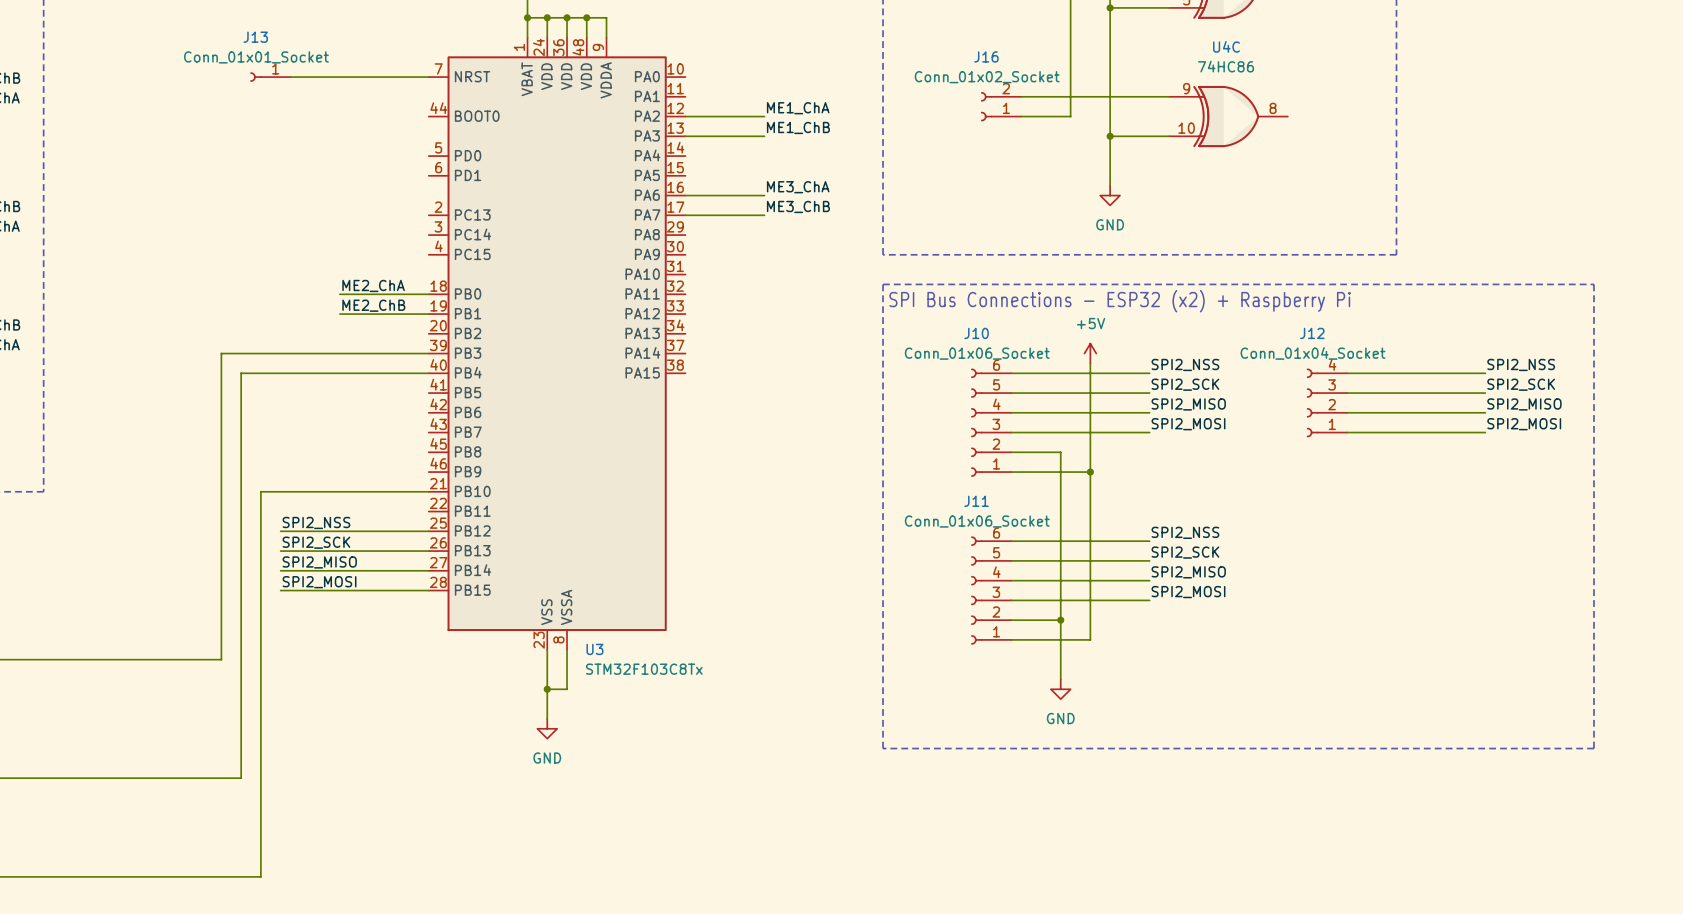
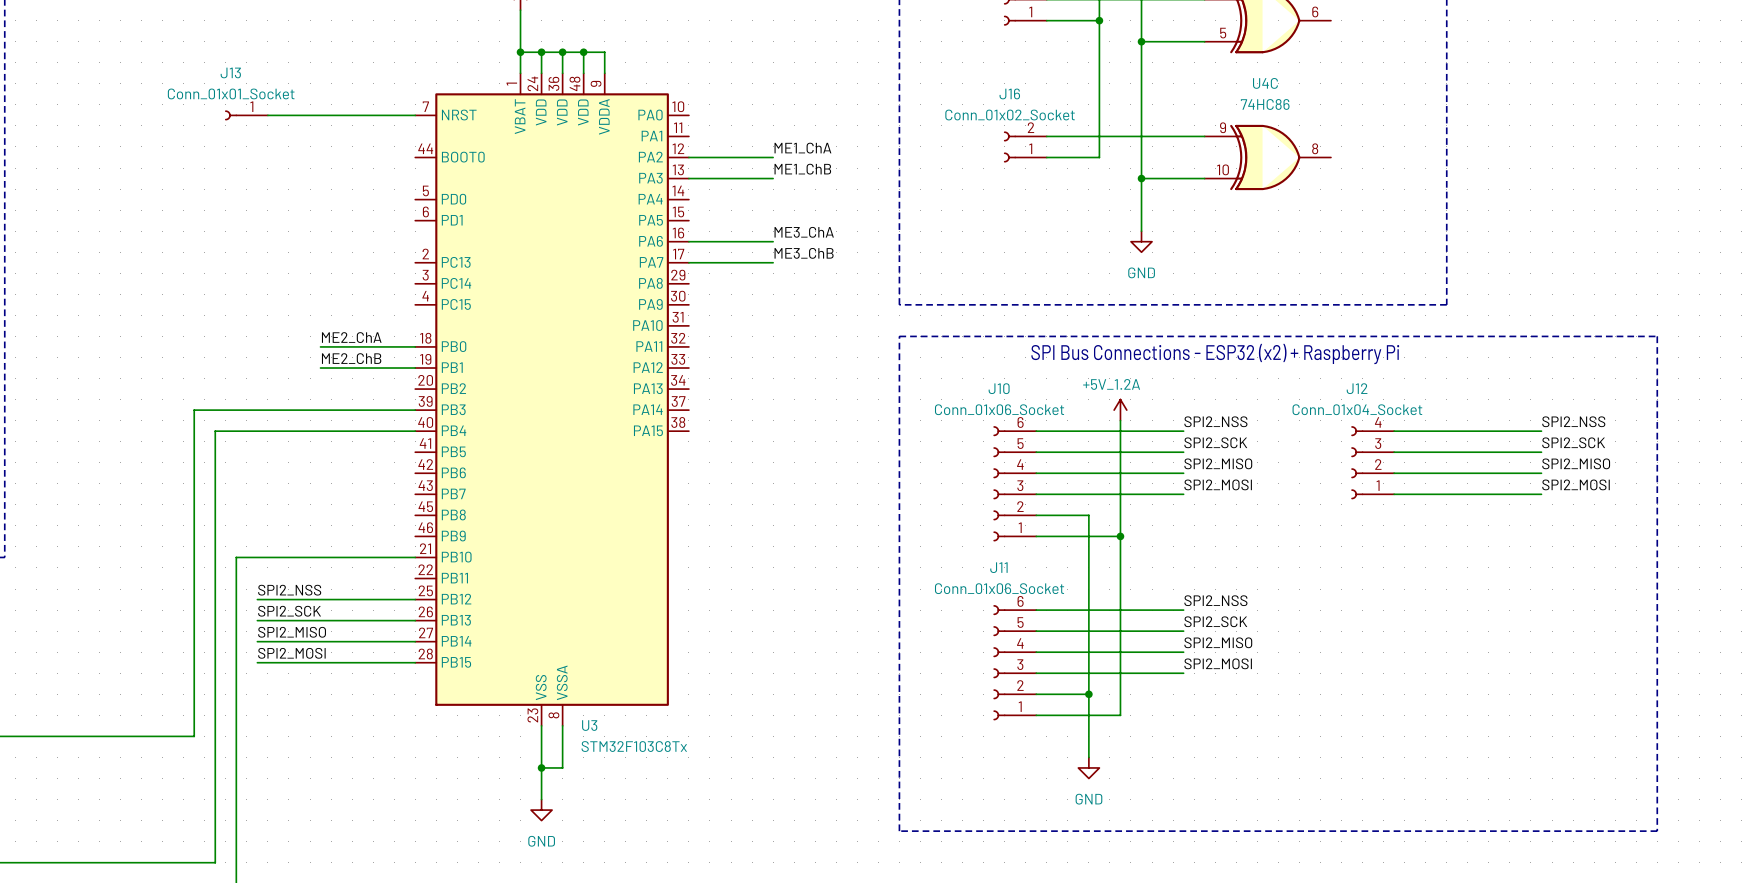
power symbol: +5V (1090, 353) -> +5V_1.2A (1120, 410)

